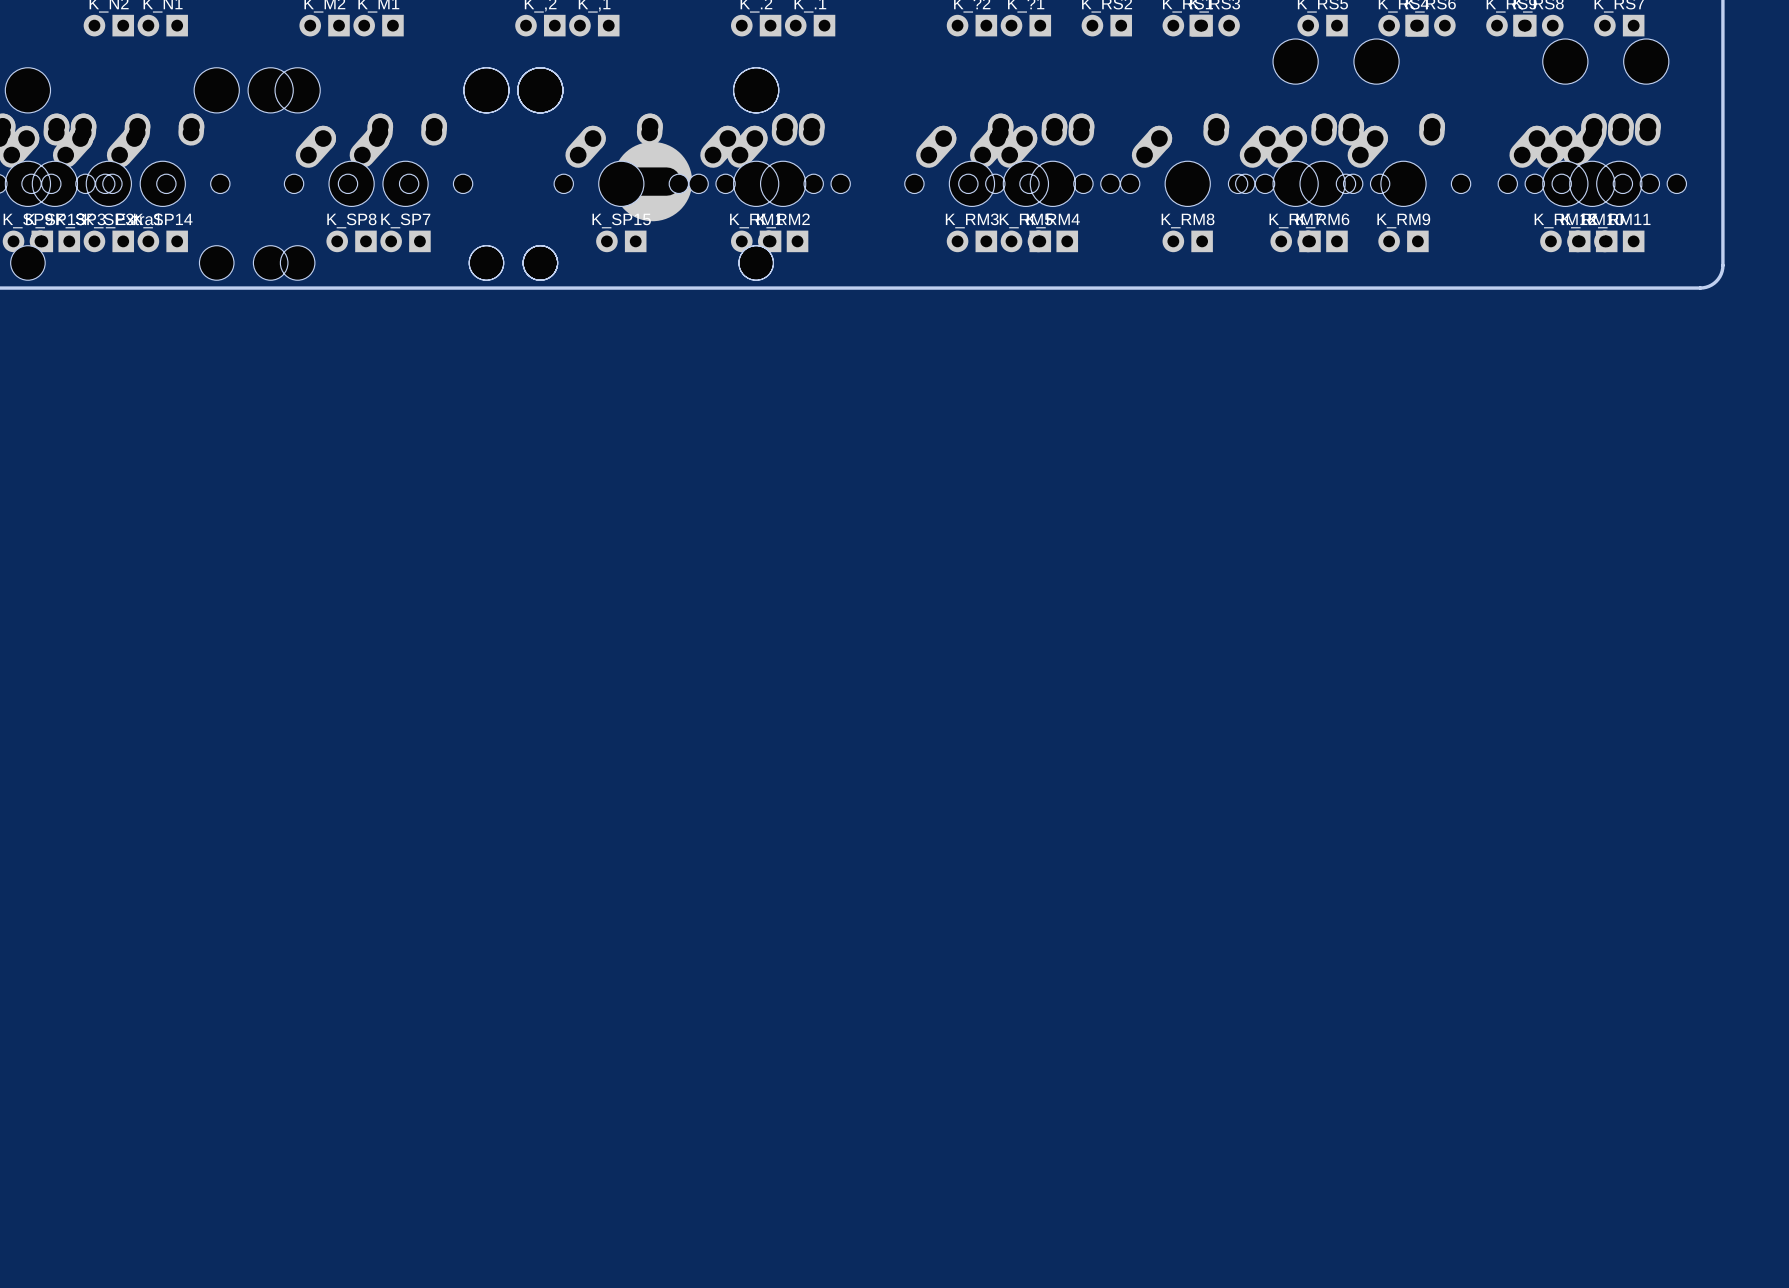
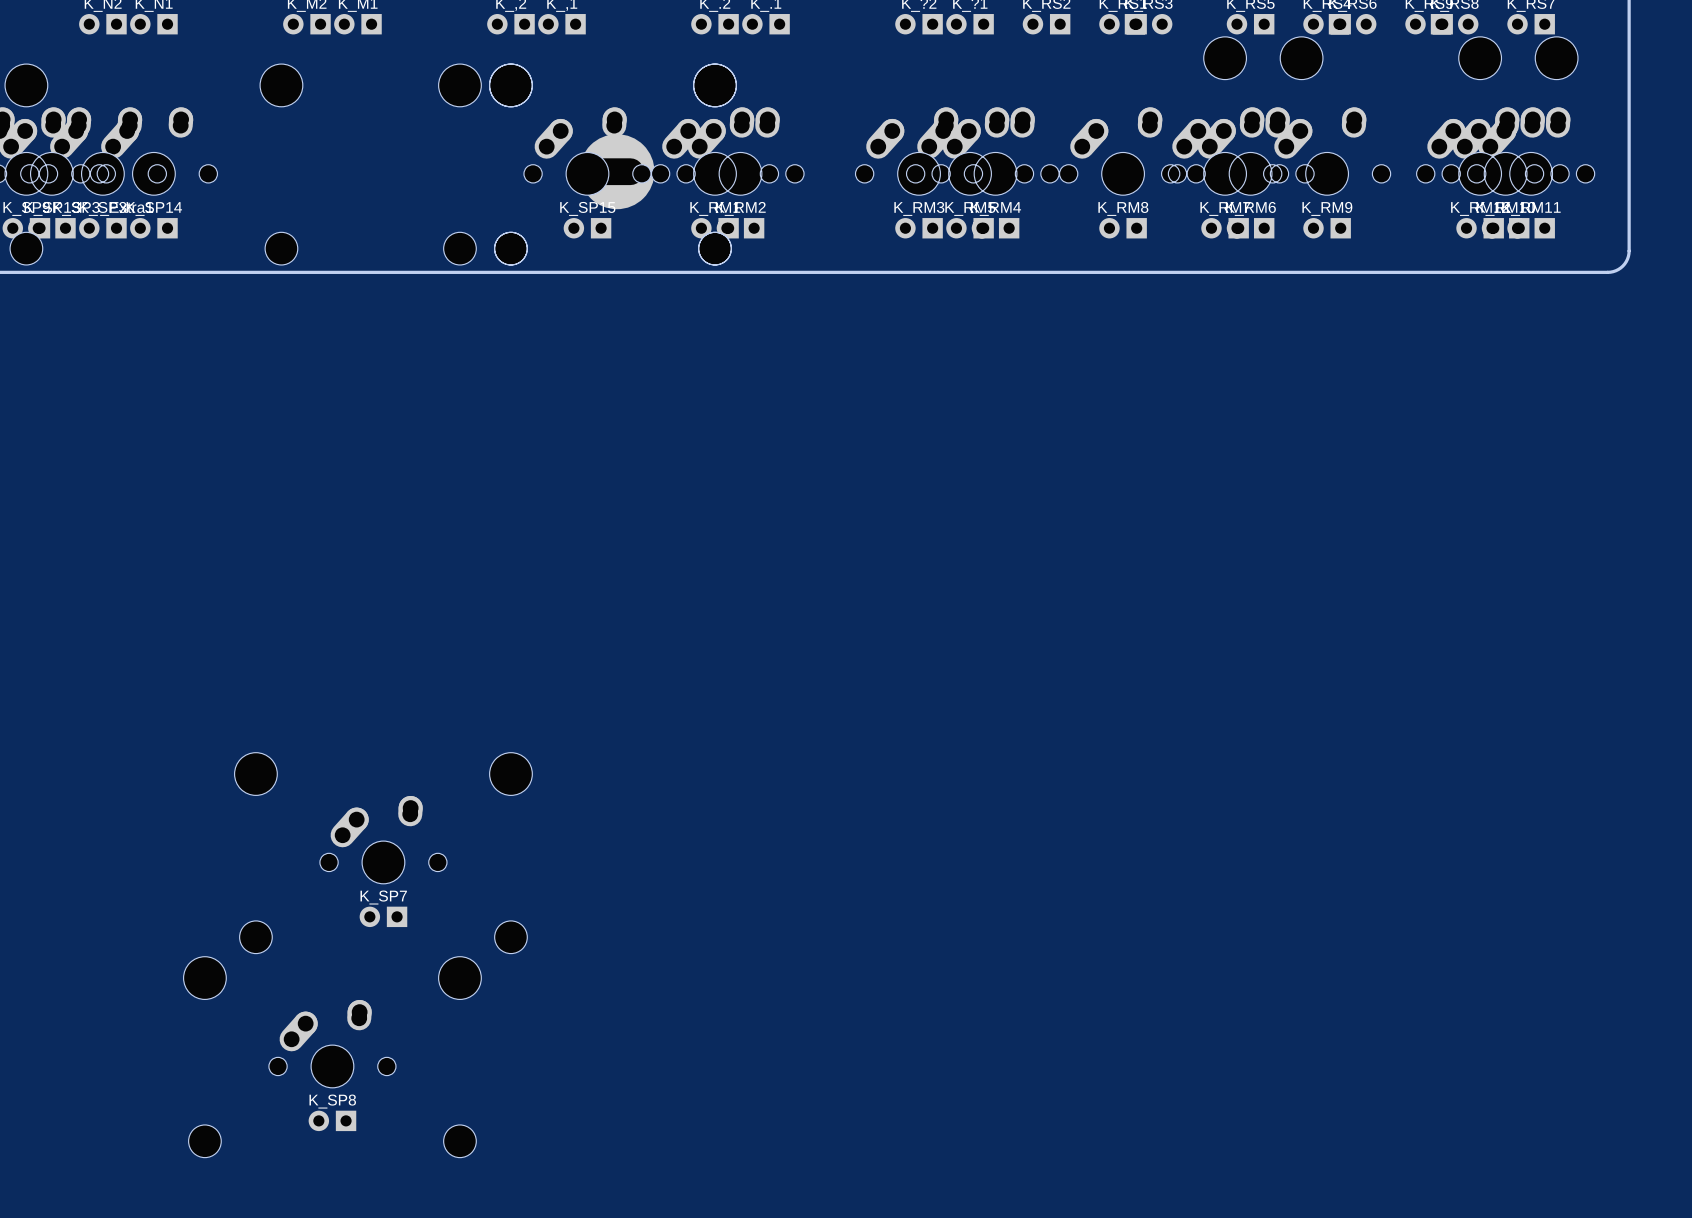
K_SP8 position: (351, 173) -> (332, 1057)
K_SP7 position: (405, 173) -> (383, 853)

